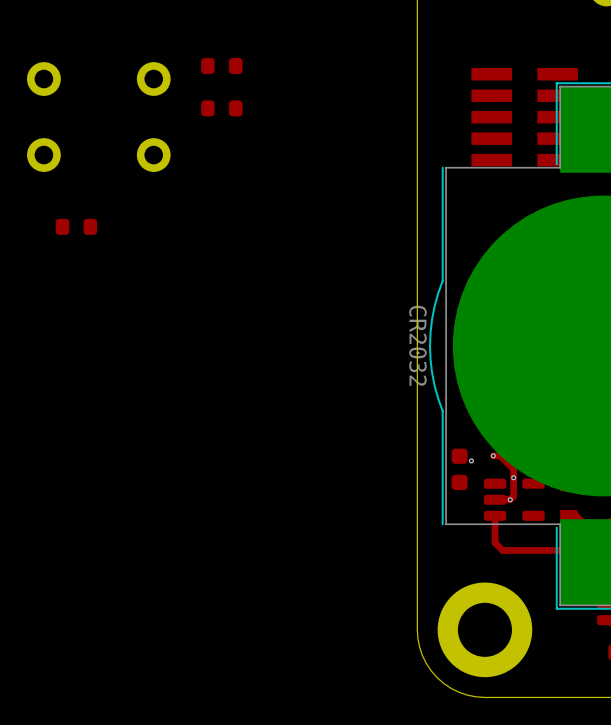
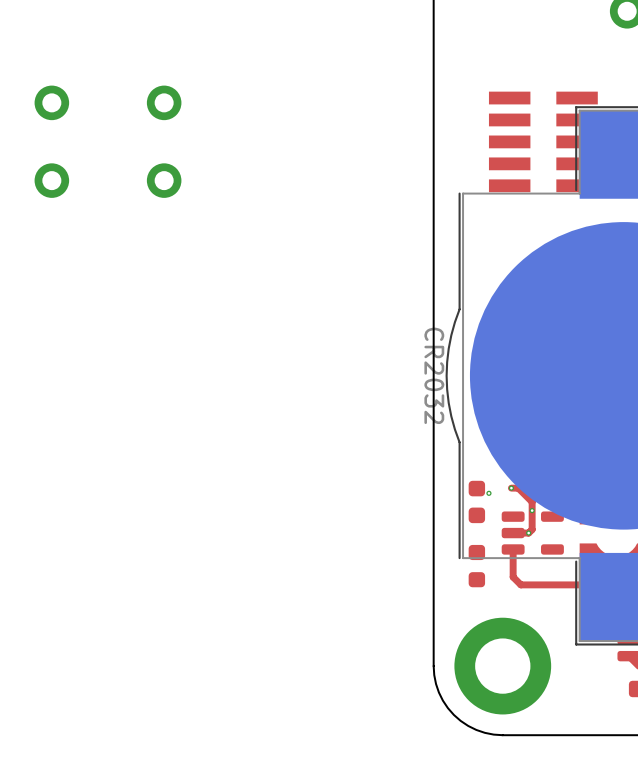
part: (221, 65) -> none
part: (221, 108) -> none
part: (76, 226) -> none
part: none -> (476, 566)

